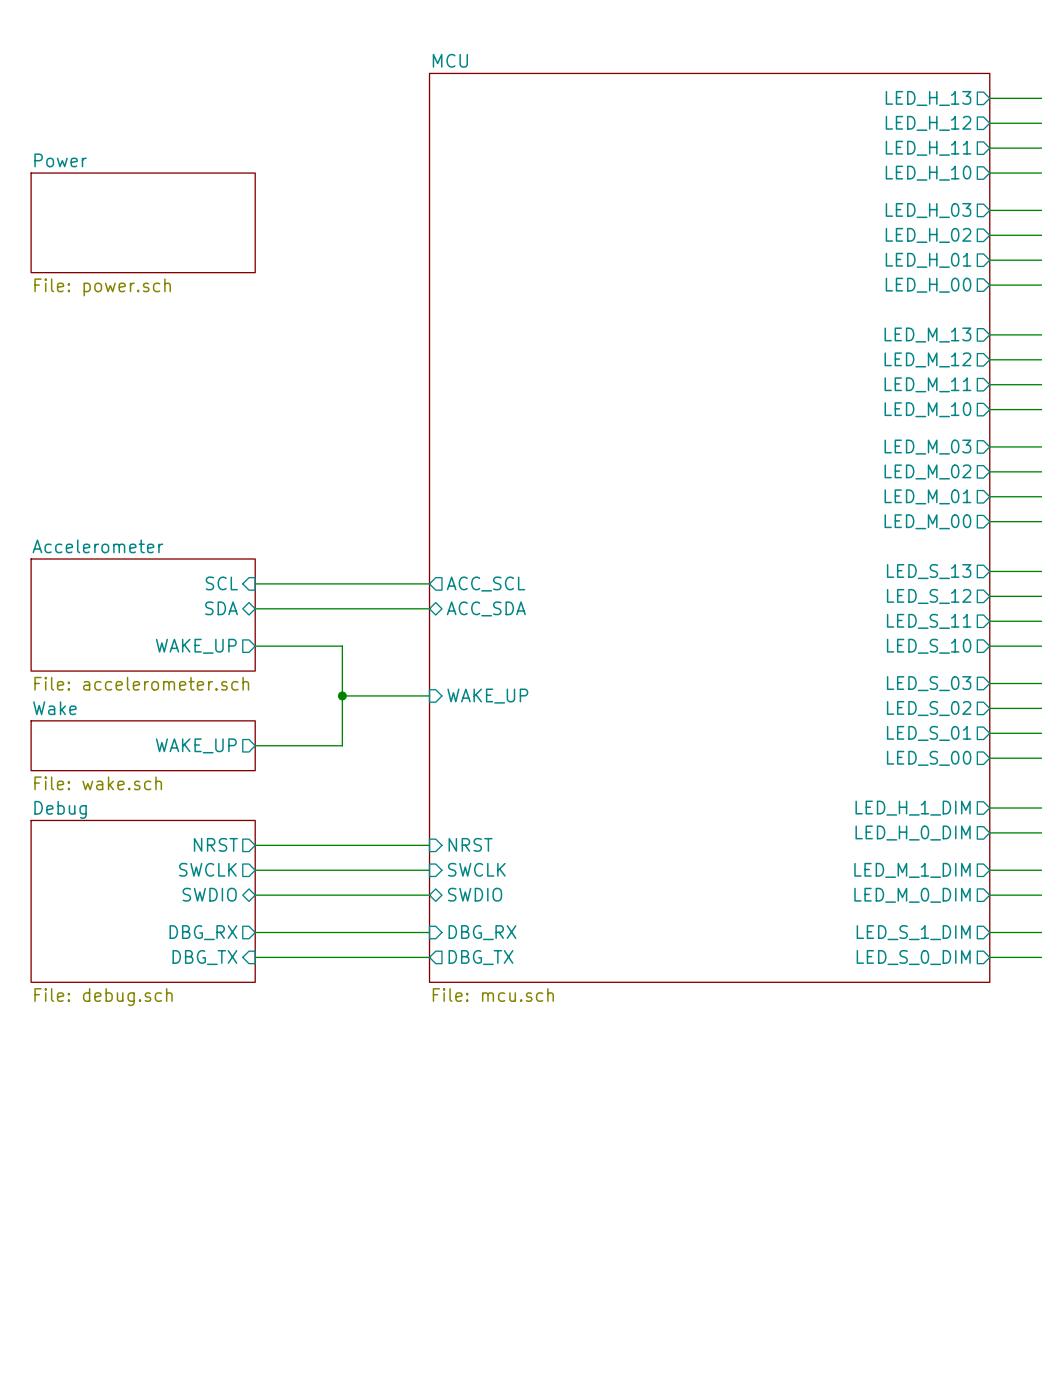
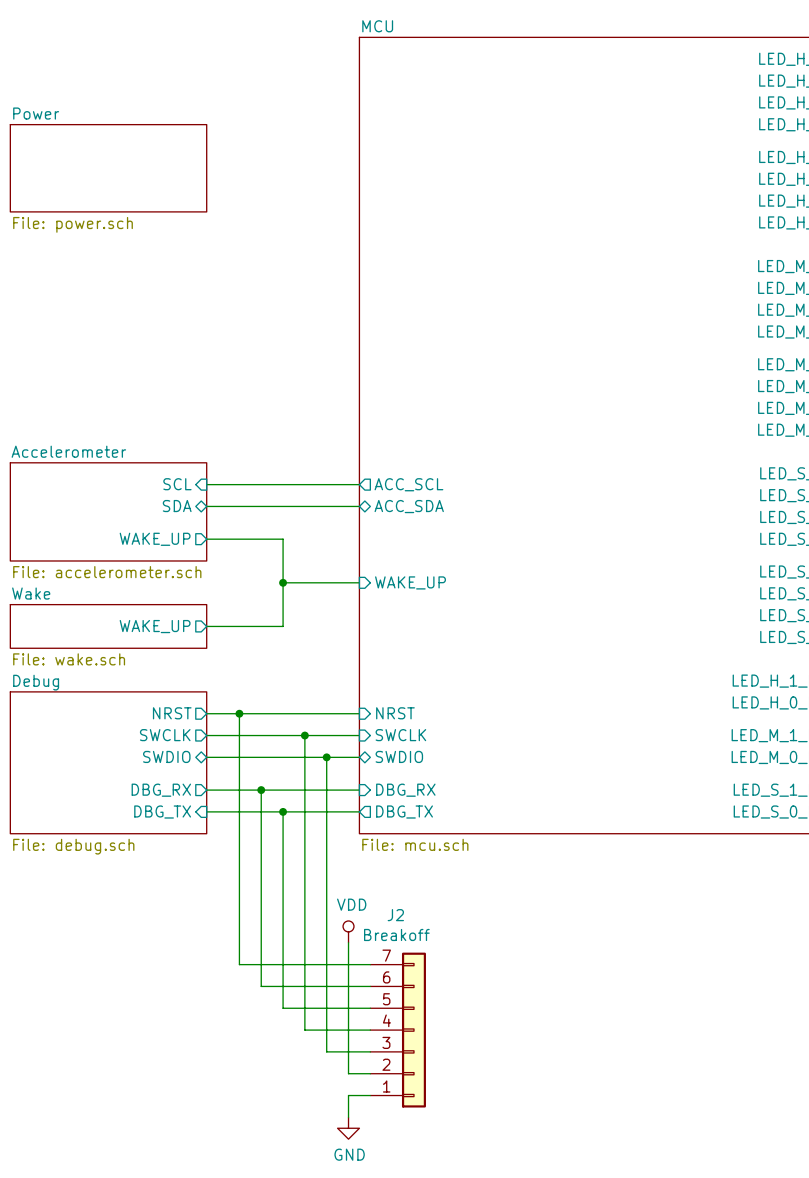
wire: none -> (239, 713) (239, 964) (370, 964)
junction: none -> (239, 713)
wire: none -> (304, 735) (304, 1030) (370, 1030)
junction: none -> (304, 735)
wire: none -> (326, 757) (326, 1051) (370, 1051)
junction: none -> (326, 757)
wire: none -> (261, 790) (261, 986) (370, 986)
junction: none -> (261, 790)
wire: none -> (283, 811) (283, 1008) (370, 1008)
junction: none -> (283, 811)
power symbol: none -> VDD (348, 931)
wire: none -> (348, 942) (348, 1073) (370, 1073)
J2: none -> Breakoff (398, 1030)
wire: none -> (370, 1095) (348, 1095) (348, 1117)
power symbol: none -> GND (348, 1128)

